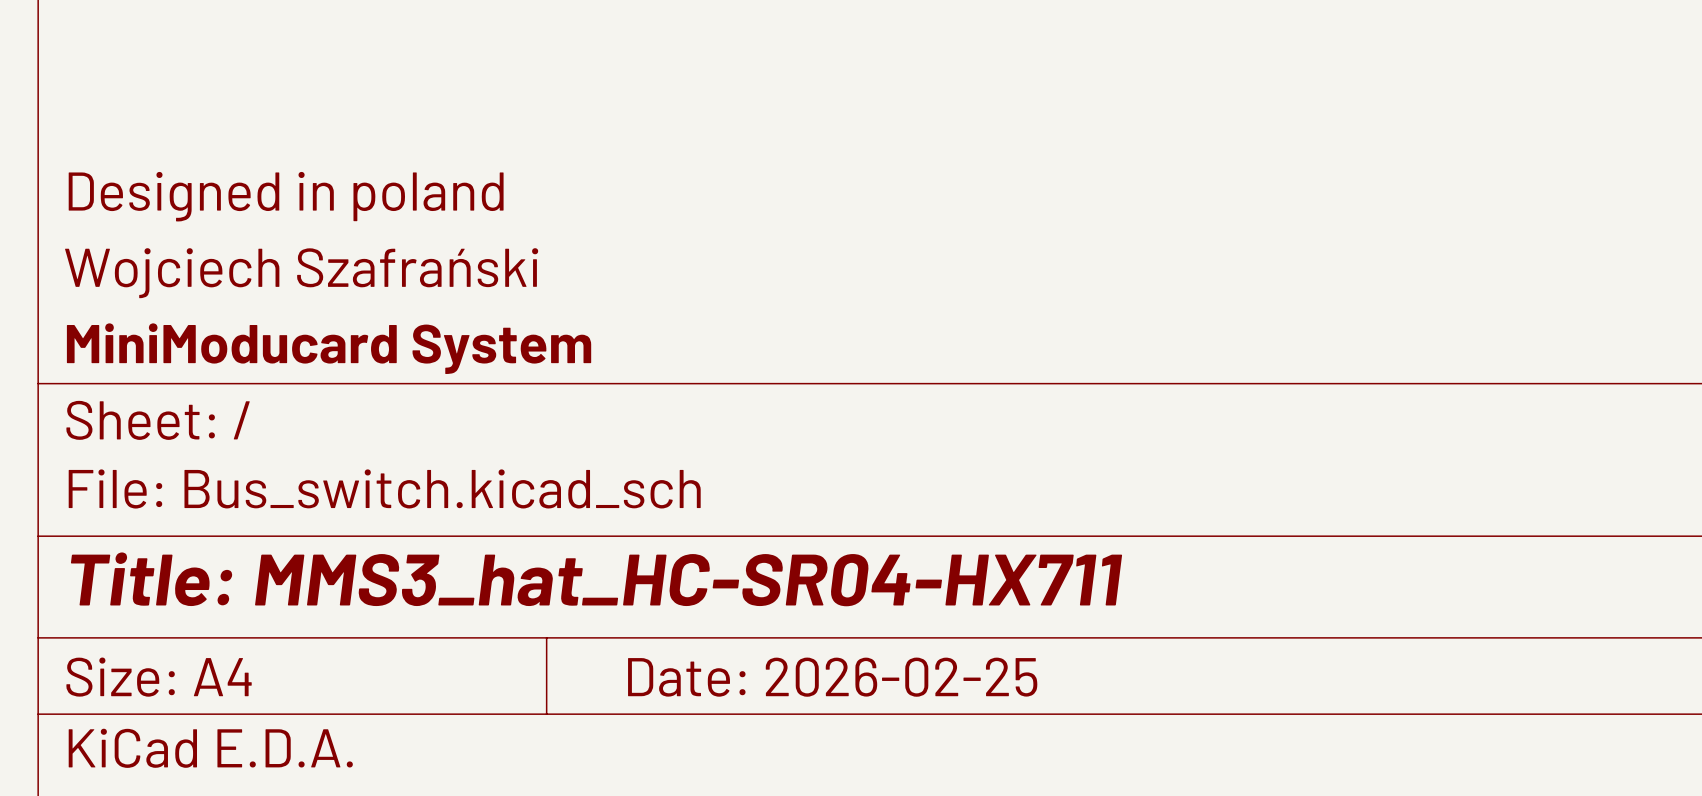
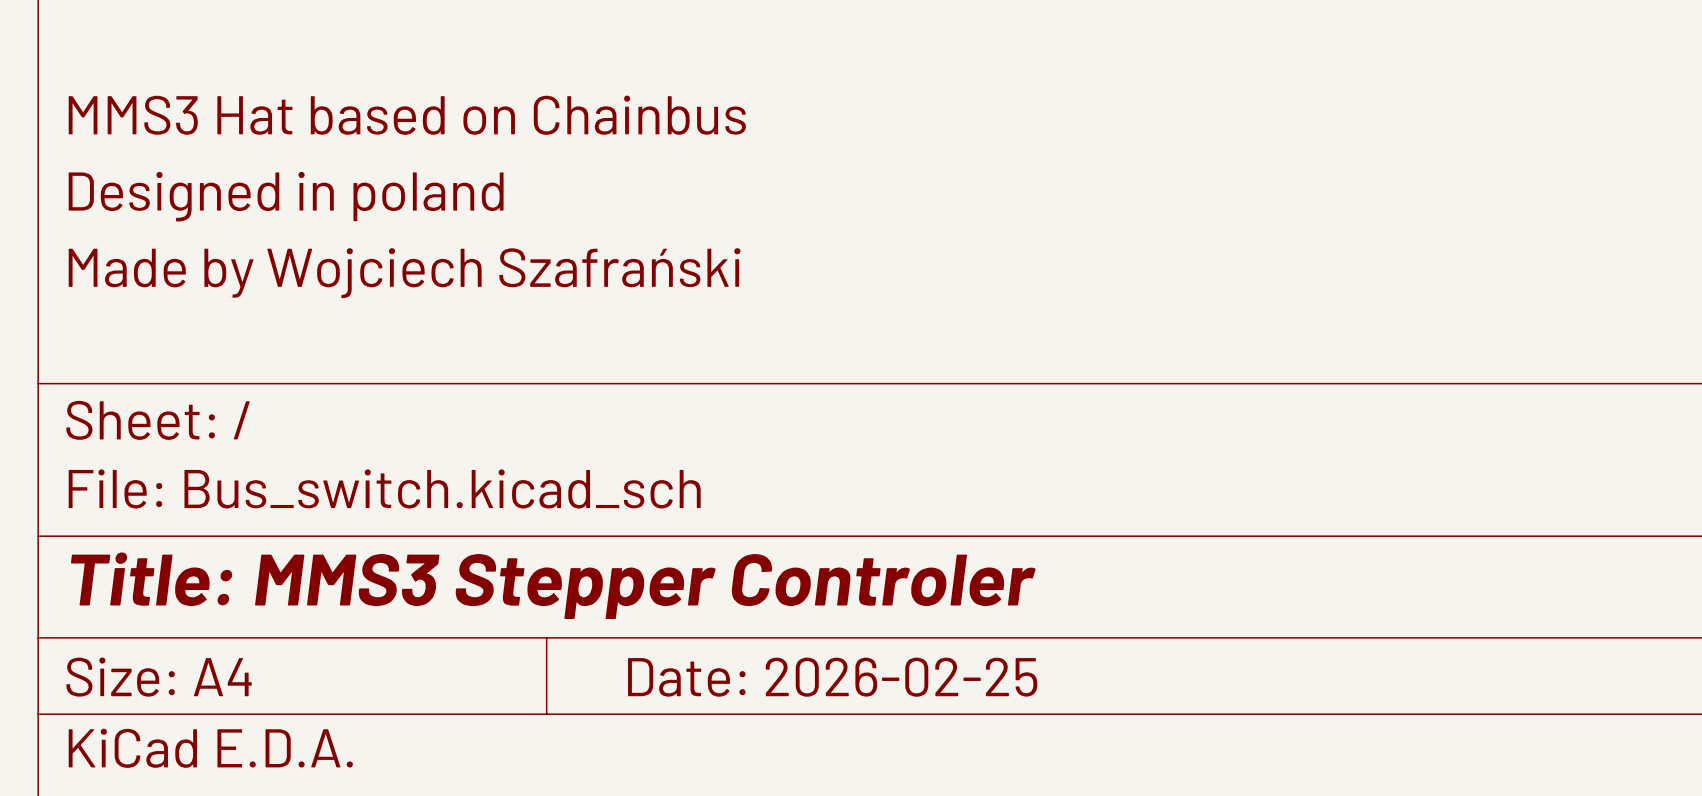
title block: none -> MMS3 Hat based on Chainbus (407, 115)
title block: Wojciech Szafrański (301, 273) -> Made by Wojciech Szafrański (404, 273)
title block: MiniModucard System (329, 348) -> none
title block: Title: MMS3_hat_HC-SR04-HX711 (596, 579) -> Title: MMS3 Stepper Controler (553, 585)

